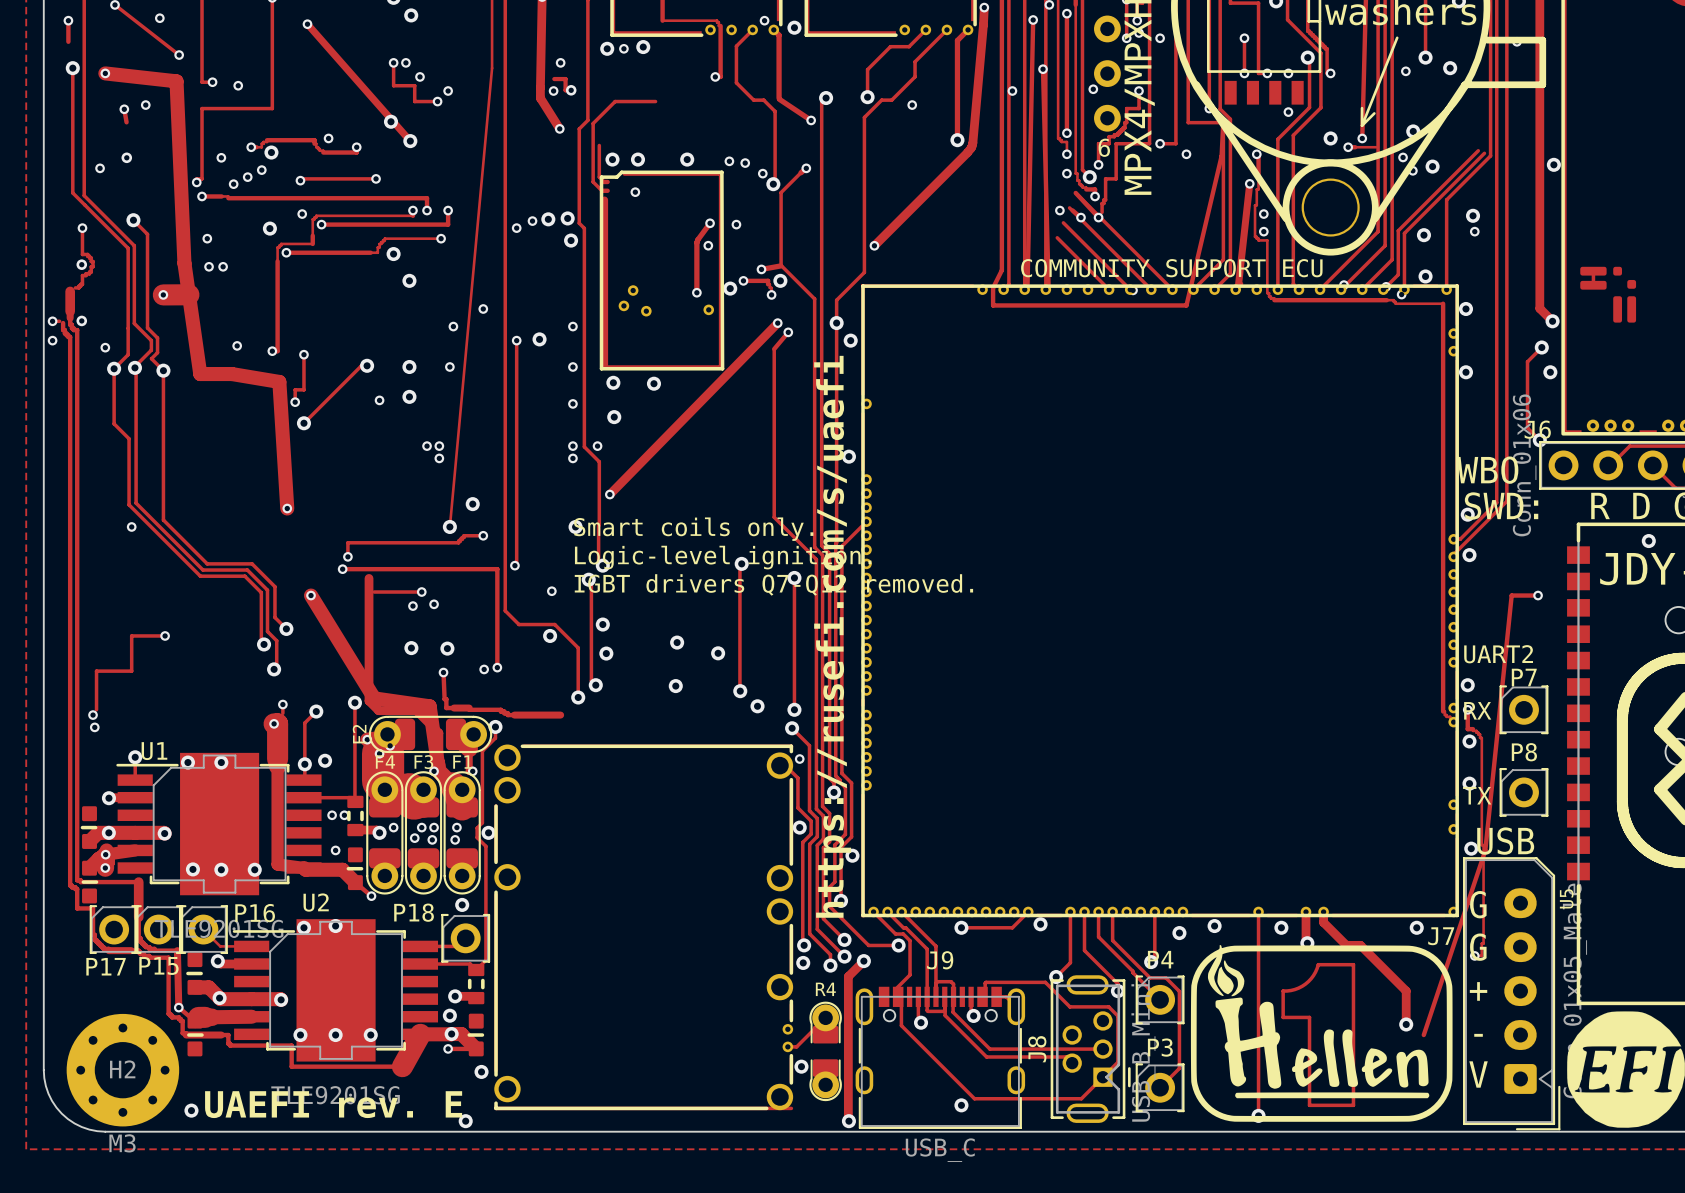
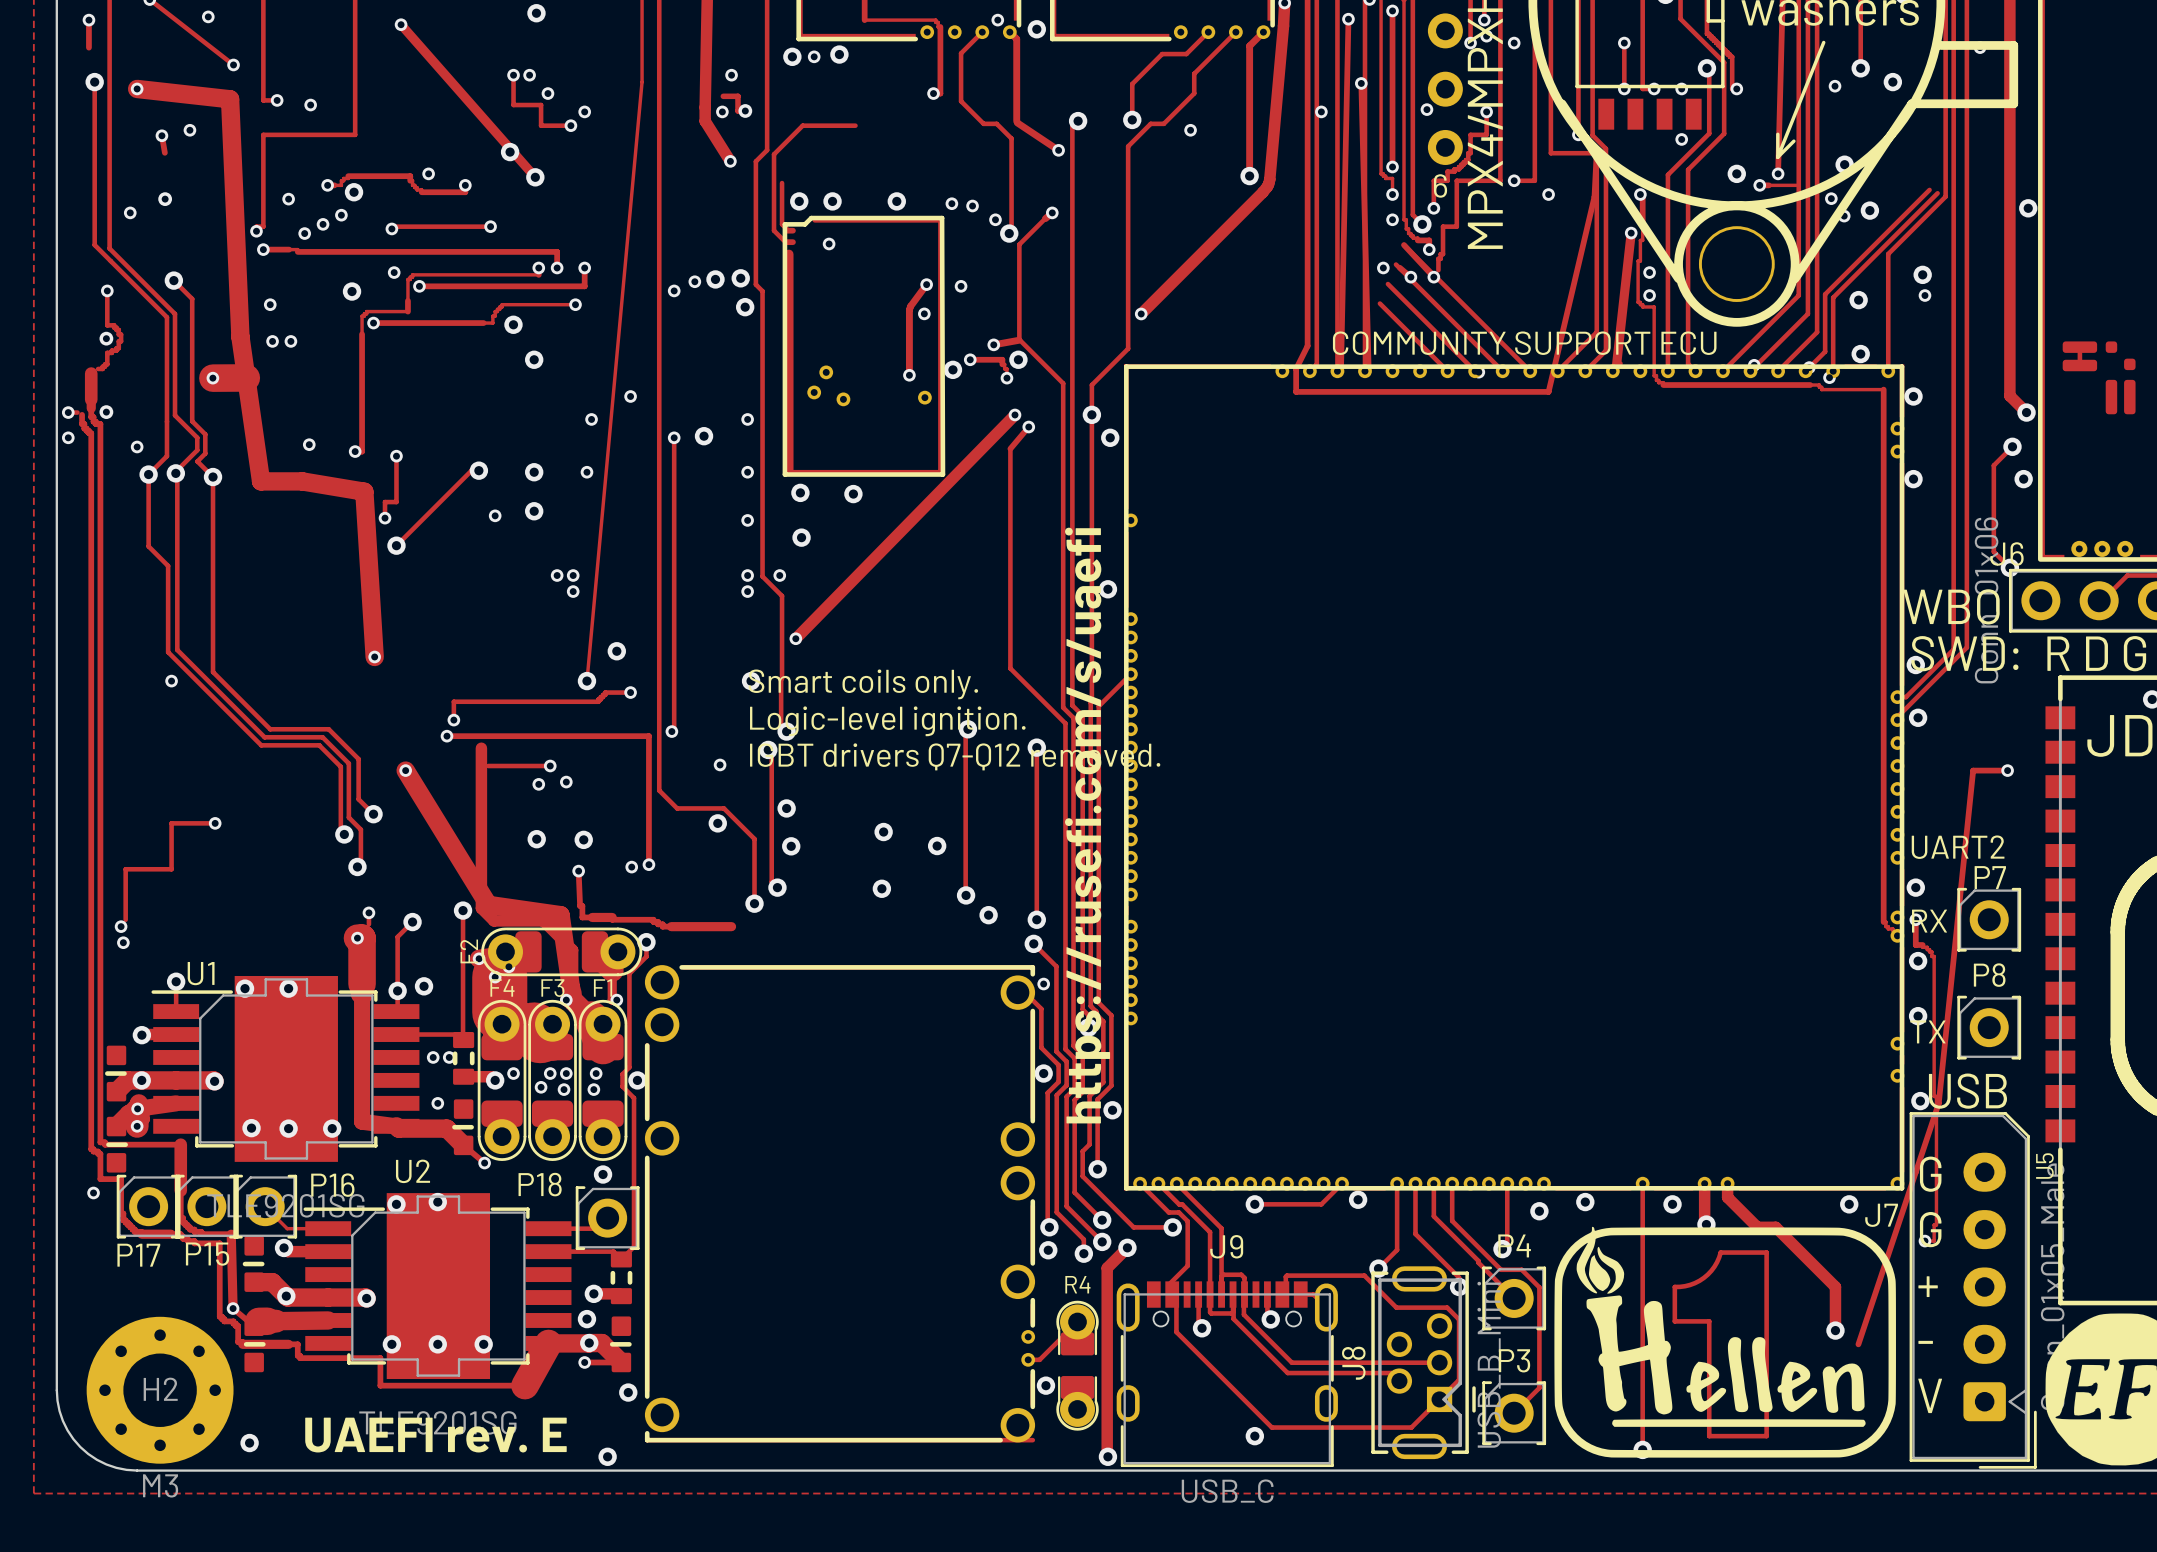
via: none -> (93, 1192)

